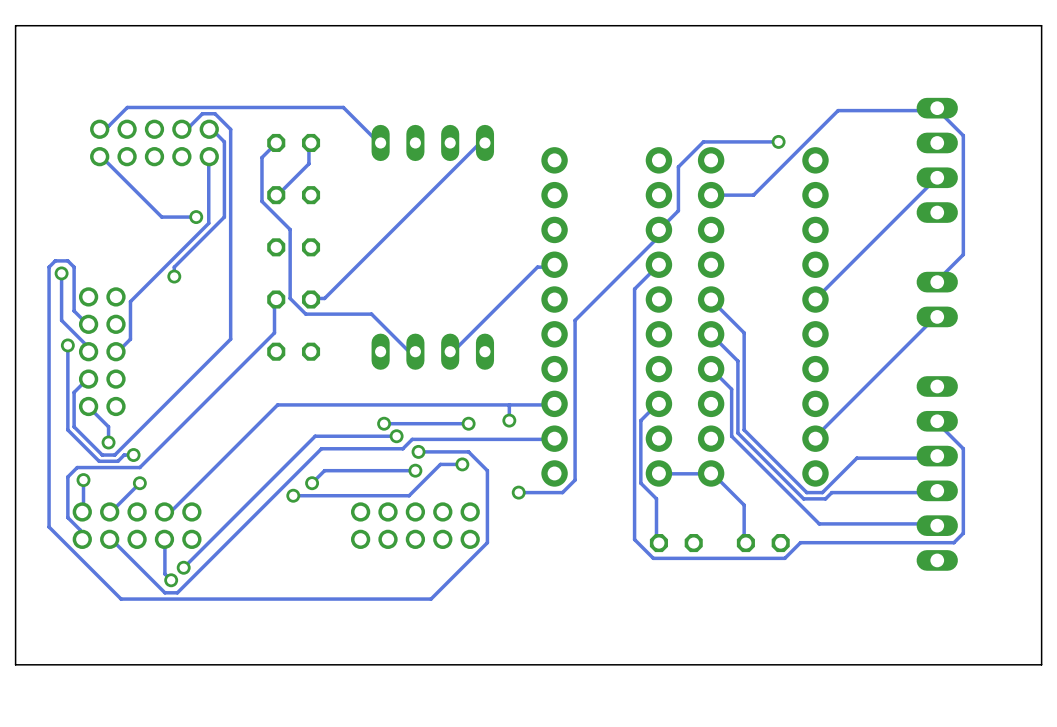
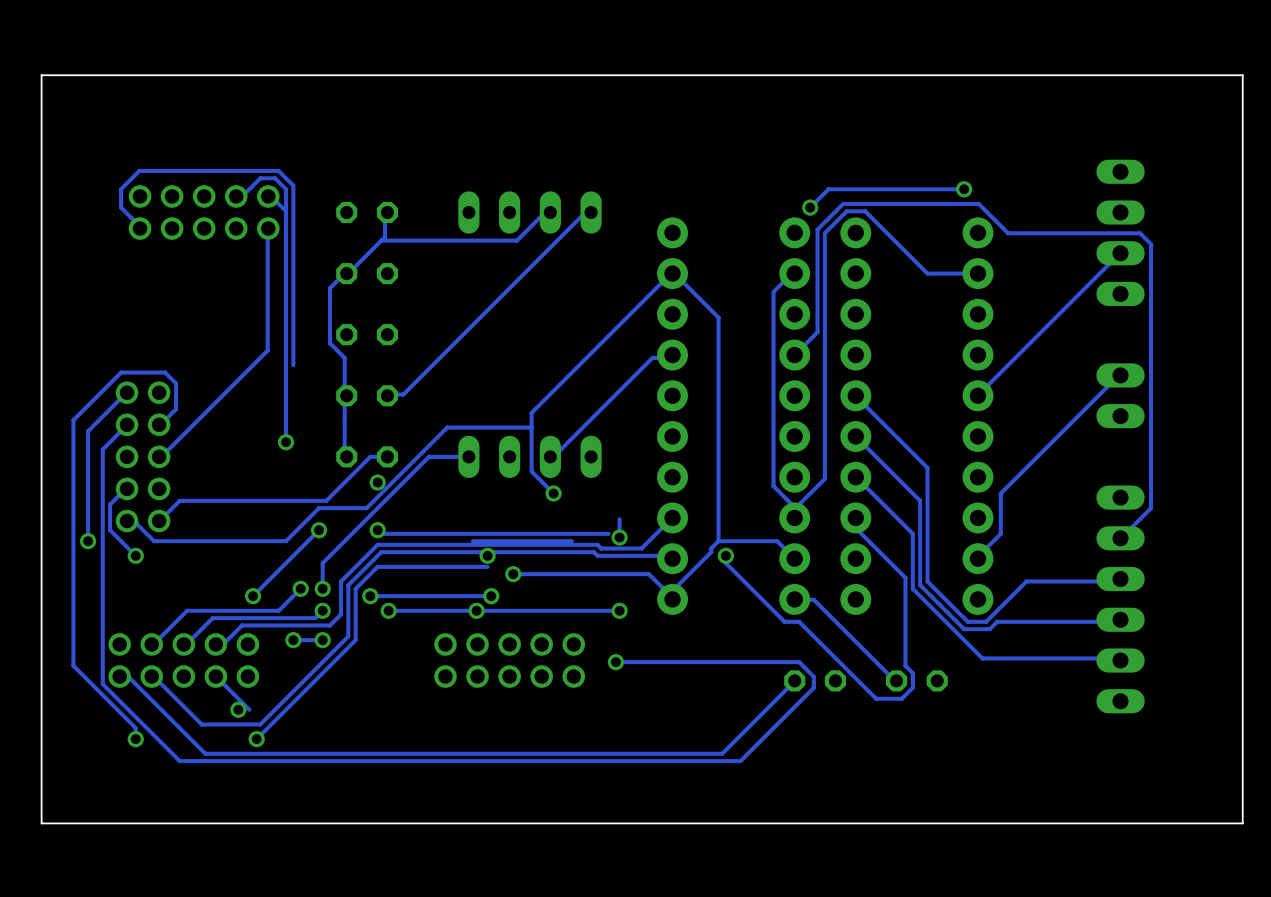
track: (127, 107) (108, 126) (102, 126) (99, 129) -> (172, 170) (139, 170) (121, 189) (121, 207) (140, 228)
track: (218, 107) (343, 107) (380, 142) -> (278, 170) (293, 185) (293, 196)
track: (224, 123) (230, 129) -> (286, 189) (286, 211)
track: none -> (964, 189) (828, 189) (810, 207)
via: none -> (810, 207)
track: (778, 141) (719, 141) -> (977, 273) (927, 273) (865, 211)
via position: (778, 141) -> (964, 189)
track: (276, 142) (261, 157) (261, 201) (290, 229) (290, 298) (305, 314) (371, 314) (409, 351) (415, 351) -> none
track: none -> (550, 212) (549, 214) (542, 214) (516, 240) (381, 240)
track: (99, 156) (161, 217) (196, 217) -> none
track: (684, 160) (678, 166) -> (824, 233) (824, 478) (791, 511) (794, 517) (791, 515) (791, 504) (773, 486) (773, 291) (791, 273) (794, 273)
track: (963, 170) (963, 135) (937, 108) (935, 110) (838, 110) (753, 195) (711, 195) -> (1151, 244) (1140, 233) (1008, 233) (978, 203) (843, 203) (817, 229) (817, 240)
track: none -> (346, 273) (330, 288) (330, 343) (344, 357) (344, 394) (346, 395)
track: (678, 210) (656, 232) (656, 238) (575, 320) (575, 480) (562, 492) (518, 492) -> (817, 291) (817, 332) (794, 355)
via: (196, 217) -> none
track: (224, 217) (174, 267) (174, 276) -> (286, 299) (286, 442)
track: (208, 223) (130, 301) -> (267, 306) (267, 350) (176, 442)
track: (963, 254) (937, 282) -> (1151, 343) (1151, 508) (1120, 538)
track: (658, 264) (634, 289) (634, 539) (653, 558) (728, 558) -> none
track: (61, 273) (61, 320) (86, 345) (86, 351) (88, 351) -> none
via: (61, 273) -> none
track: (230, 273) (230, 339) (114, 455) (102, 455) (74, 426) (74, 414) -> (135, 555) (110, 530)
via: (174, 276) -> none
track: none -> (127, 392) (88, 431) (88, 541)
track: none -> (176, 398) (176, 383) (165, 372) (121, 372) (73, 420) (73, 665) (135, 728) (135, 739)
track: (130, 311) (130, 339) -> (176, 409) (159, 424)
track: (937, 316) (834, 417) -> (1120, 375) (1000, 493) (1000, 533)
track: (88, 324) (74, 311) (74, 267) (67, 260) (55, 260) (49, 267) (49, 527) (67, 545) -> (127, 424) (102, 449)
track: (274, 332) (139, 467) (77, 467) (67, 476) -> (344, 434) (344, 456) (346, 456)
track: (744, 332) (744, 429) (772, 458) -> (894, 434) (927, 467) (927, 581)
via: none -> (286, 442)
via: (67, 345) -> none
track: none -> (387, 456) (370, 456) (326, 500) (179, 500) (159, 521)
track: none -> (468, 456) (428, 456) (322, 563) (322, 588)
track: (737, 361) (737, 433) (766, 461) -> (887, 467) (920, 500) (920, 585)
via: none -> (377, 482)
track: none -> (553, 493) (531, 471) (531, 412) (670, 273) (674, 273) (718, 317) (718, 541)
via: none -> (553, 493)
track: (731, 389) (731, 436) (759, 464) -> (879, 500) (912, 533) (912, 588)
track: (658, 403) (640, 420) (640, 483) -> (725, 555) (725, 563) (773, 610)
track: (553, 404) (277, 404) (186, 495) -> (670, 519) (641, 548) (601, 548) (597, 544) (377, 544) (341, 581) (341, 614) (330, 625) (242, 625)
track: (89, 408) (108, 426) (108, 442) -> (128, 522) (135, 522) (154, 541) (286, 541) (319, 508) (366, 508) (447, 427) (531, 427)
track: none -> (319, 530) (253, 596)
via: none -> (319, 530)
track: none -> (377, 530) (381, 533) (608, 533)
via: none -> (377, 530)
track: (937, 421) (963, 448) (963, 533) (953, 542) (800, 542) (784, 558) (750, 558) -> (855, 517) (857, 519) (857, 530) (905, 577) (905, 665) (912, 673) (912, 687) (901, 698)
via: none -> (88, 541)
via: (384, 423) -> none
via: (468, 423) -> none
track: none -> (718, 541) (711, 548) (711, 552) (674, 588) (672, 599) (648, 574) (571, 574)
track: none -> (718, 541) (777, 541) (794, 558)
track: (67, 429) (99, 461) (117, 461) (124, 455) (133, 455) -> (102, 548) (102, 603)
track: (396, 436) (315, 436) (183, 567) -> none
via: none -> (725, 555)
track: (554, 438) (412, 439) (402, 448) (321, 448) (177, 592) (164, 592) (152, 580) -> (672, 558) (670, 555) (597, 555) (593, 552) (381, 552) (348, 585) (348, 636) (260, 724) (201, 724)
via position: (108, 442) -> (135, 555)
track: none -> (487, 566) (377, 566) (355, 588) (355, 640) (256, 739)
track: (468, 451) (487, 470) (487, 542) (431, 599) (121, 599) -> (615, 662) (799, 662) (813, 676) (813, 687) (740, 761) (179, 761) (165, 746)
via: (133, 455) -> none
track: none -> (300, 588) (278, 610) (187, 610)
via: none -> (300, 588)
via: none -> (322, 588)
track: (462, 464) (440, 464) (409, 495) (293, 495) -> none
via: (462, 464) -> none
via: none -> (253, 596)
via: none -> (370, 596)
track: (324, 470) (312, 483) -> (403, 596) (370, 596)
via: none -> (491, 596)
track: (415, 470) (399, 470) -> none
via: (415, 470) -> none
track: (675, 473) (712, 473) (744, 505) (744, 542) -> (813, 599) (894, 680)
track: (83, 480) (82, 511) -> none
via: (83, 480) -> none
via: (139, 483) -> none
track: none -> (322, 610) (315, 618) (212, 618) (187, 643) (183, 644)
via: none -> (322, 610)
via: none -> (476, 610)
track: none -> (619, 610) (385, 610)
via position: (518, 492) -> (619, 610)
track: (650, 492) (656, 498) (656, 542) (658, 543) -> (784, 621) (799, 621) (876, 698)
via: (293, 495) -> none
via: none -> (293, 640)
track: none -> (322, 640) (293, 640)
via: none -> (322, 640)
track: (67, 517) (80, 530) (82, 539) -> (102, 651) (102, 684)
via: none -> (615, 662)
track: none -> (119, 676) (128, 676) (205, 753) (722, 753) (794, 680)
track: (164, 539) (164, 574) (171, 580) -> (216, 676) (249, 709)
via position: (171, 580) -> (256, 739)
via: none -> (135, 739)

